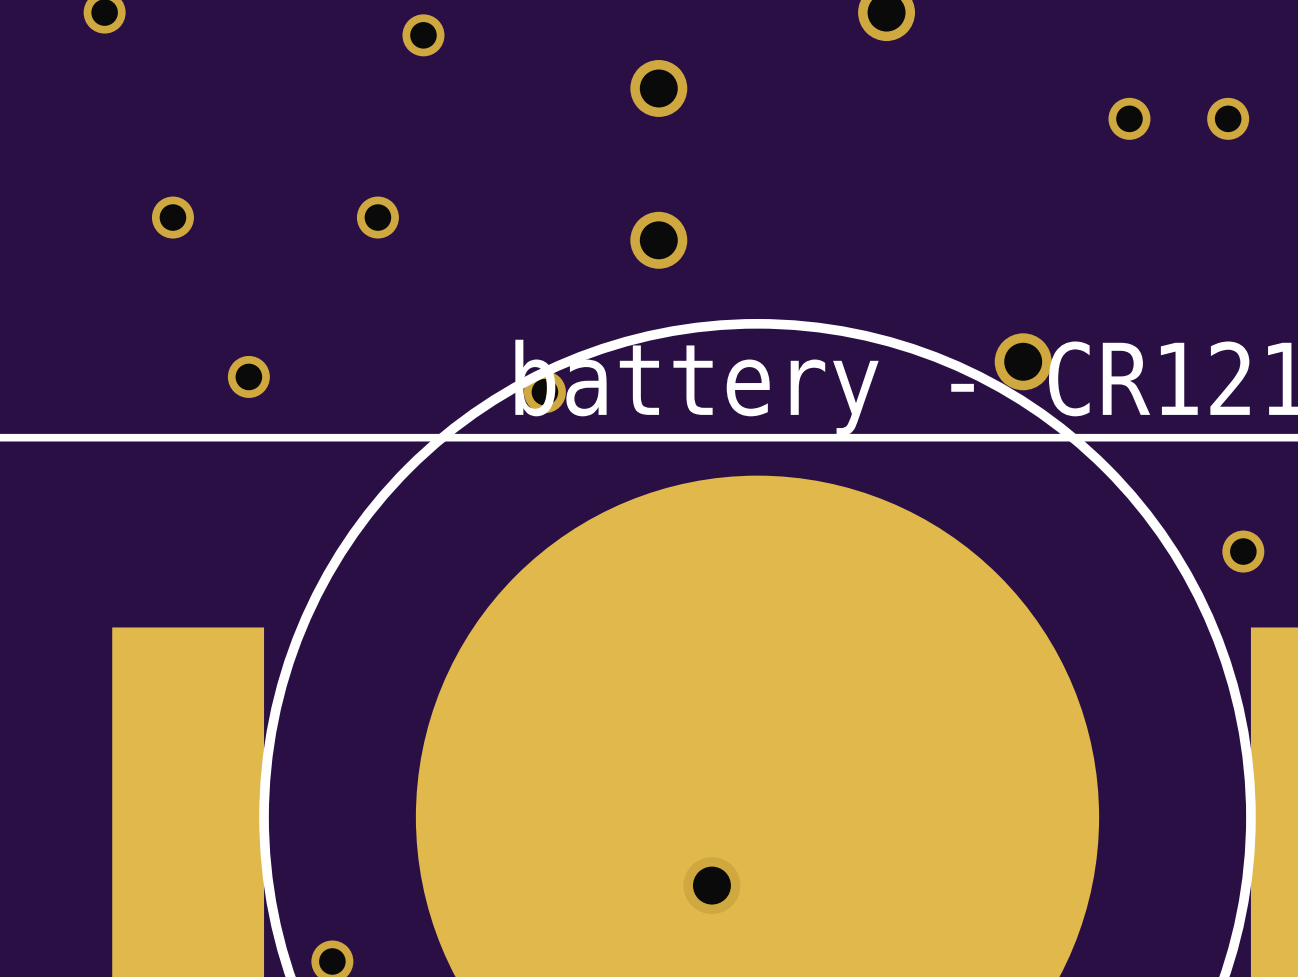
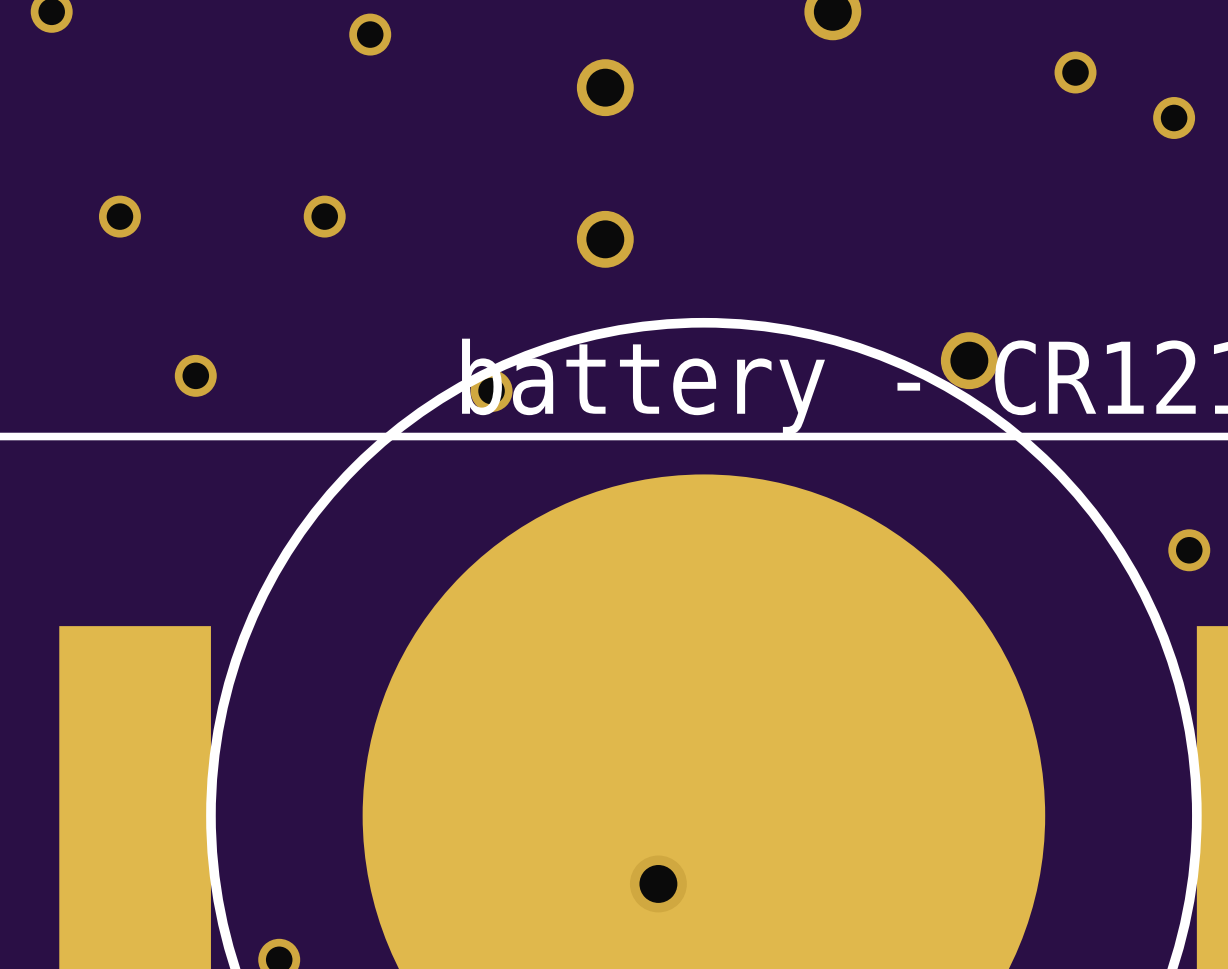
via position: (1129, 118) -> (1075, 72)

